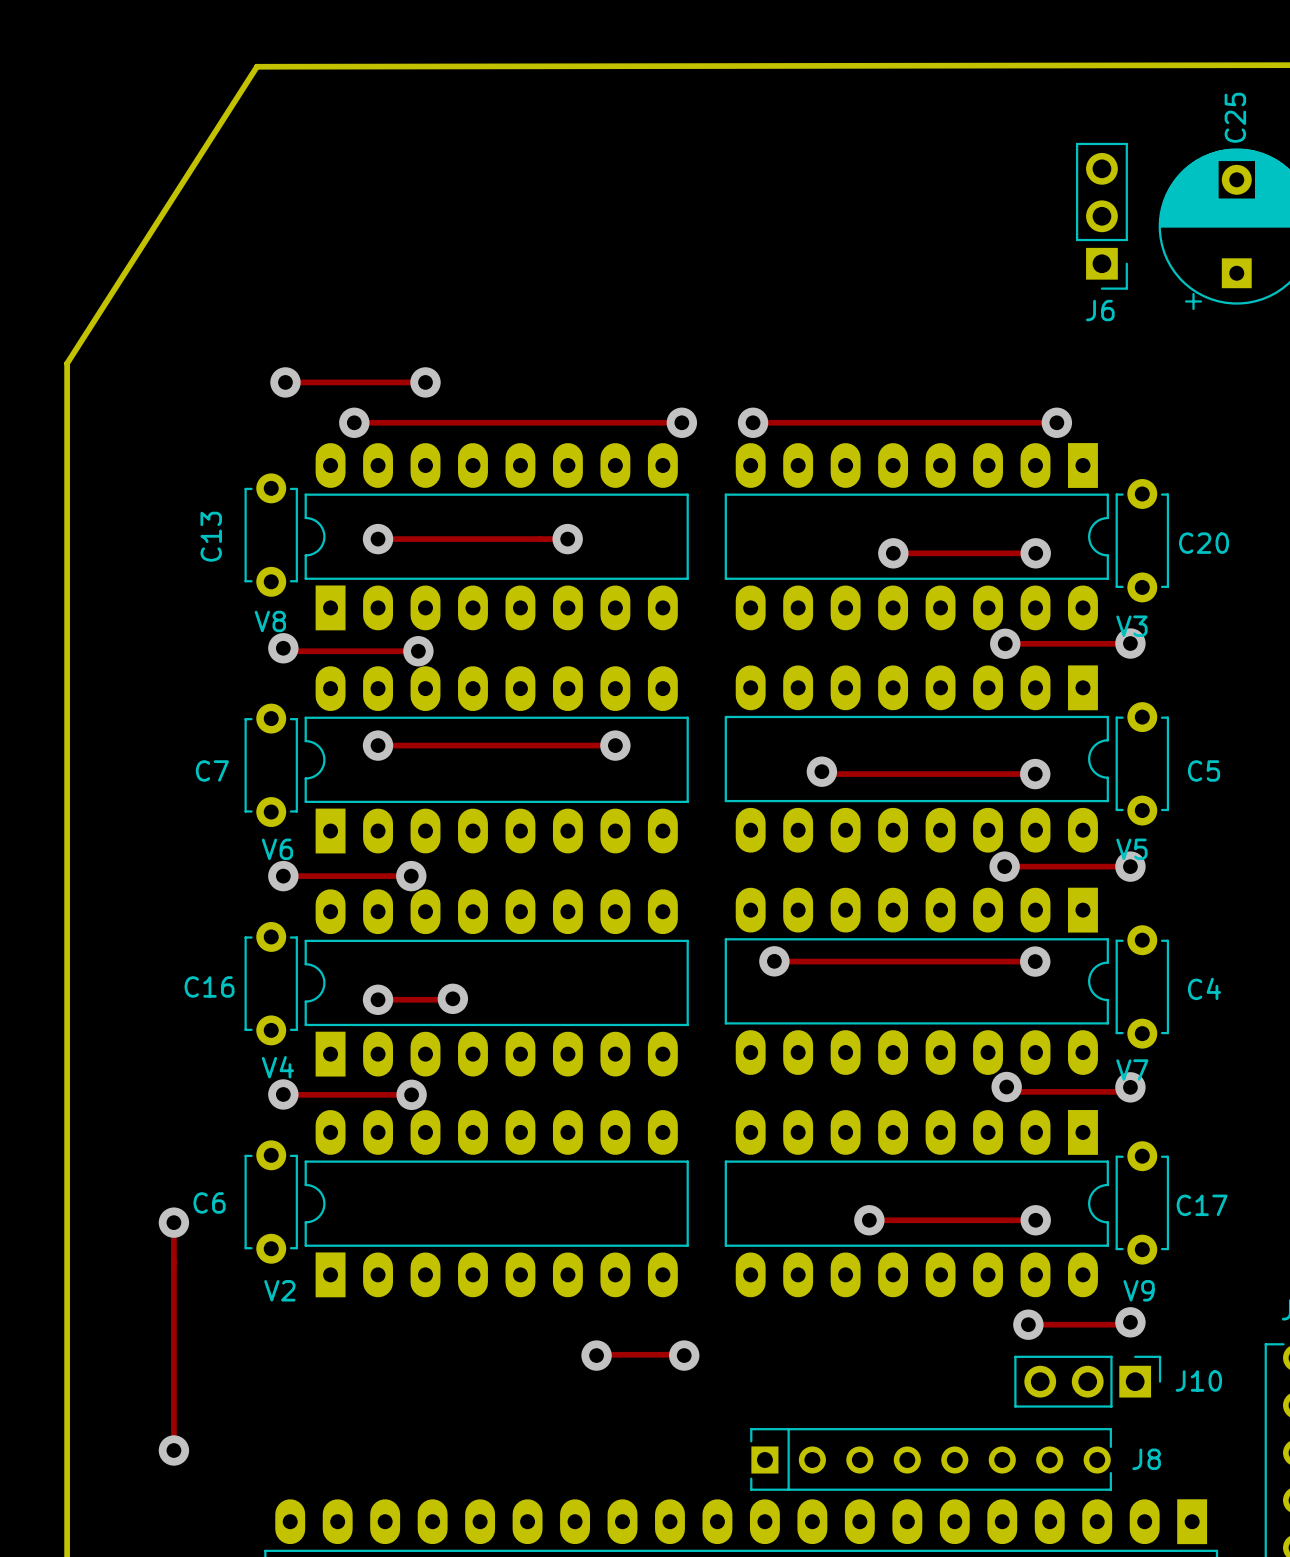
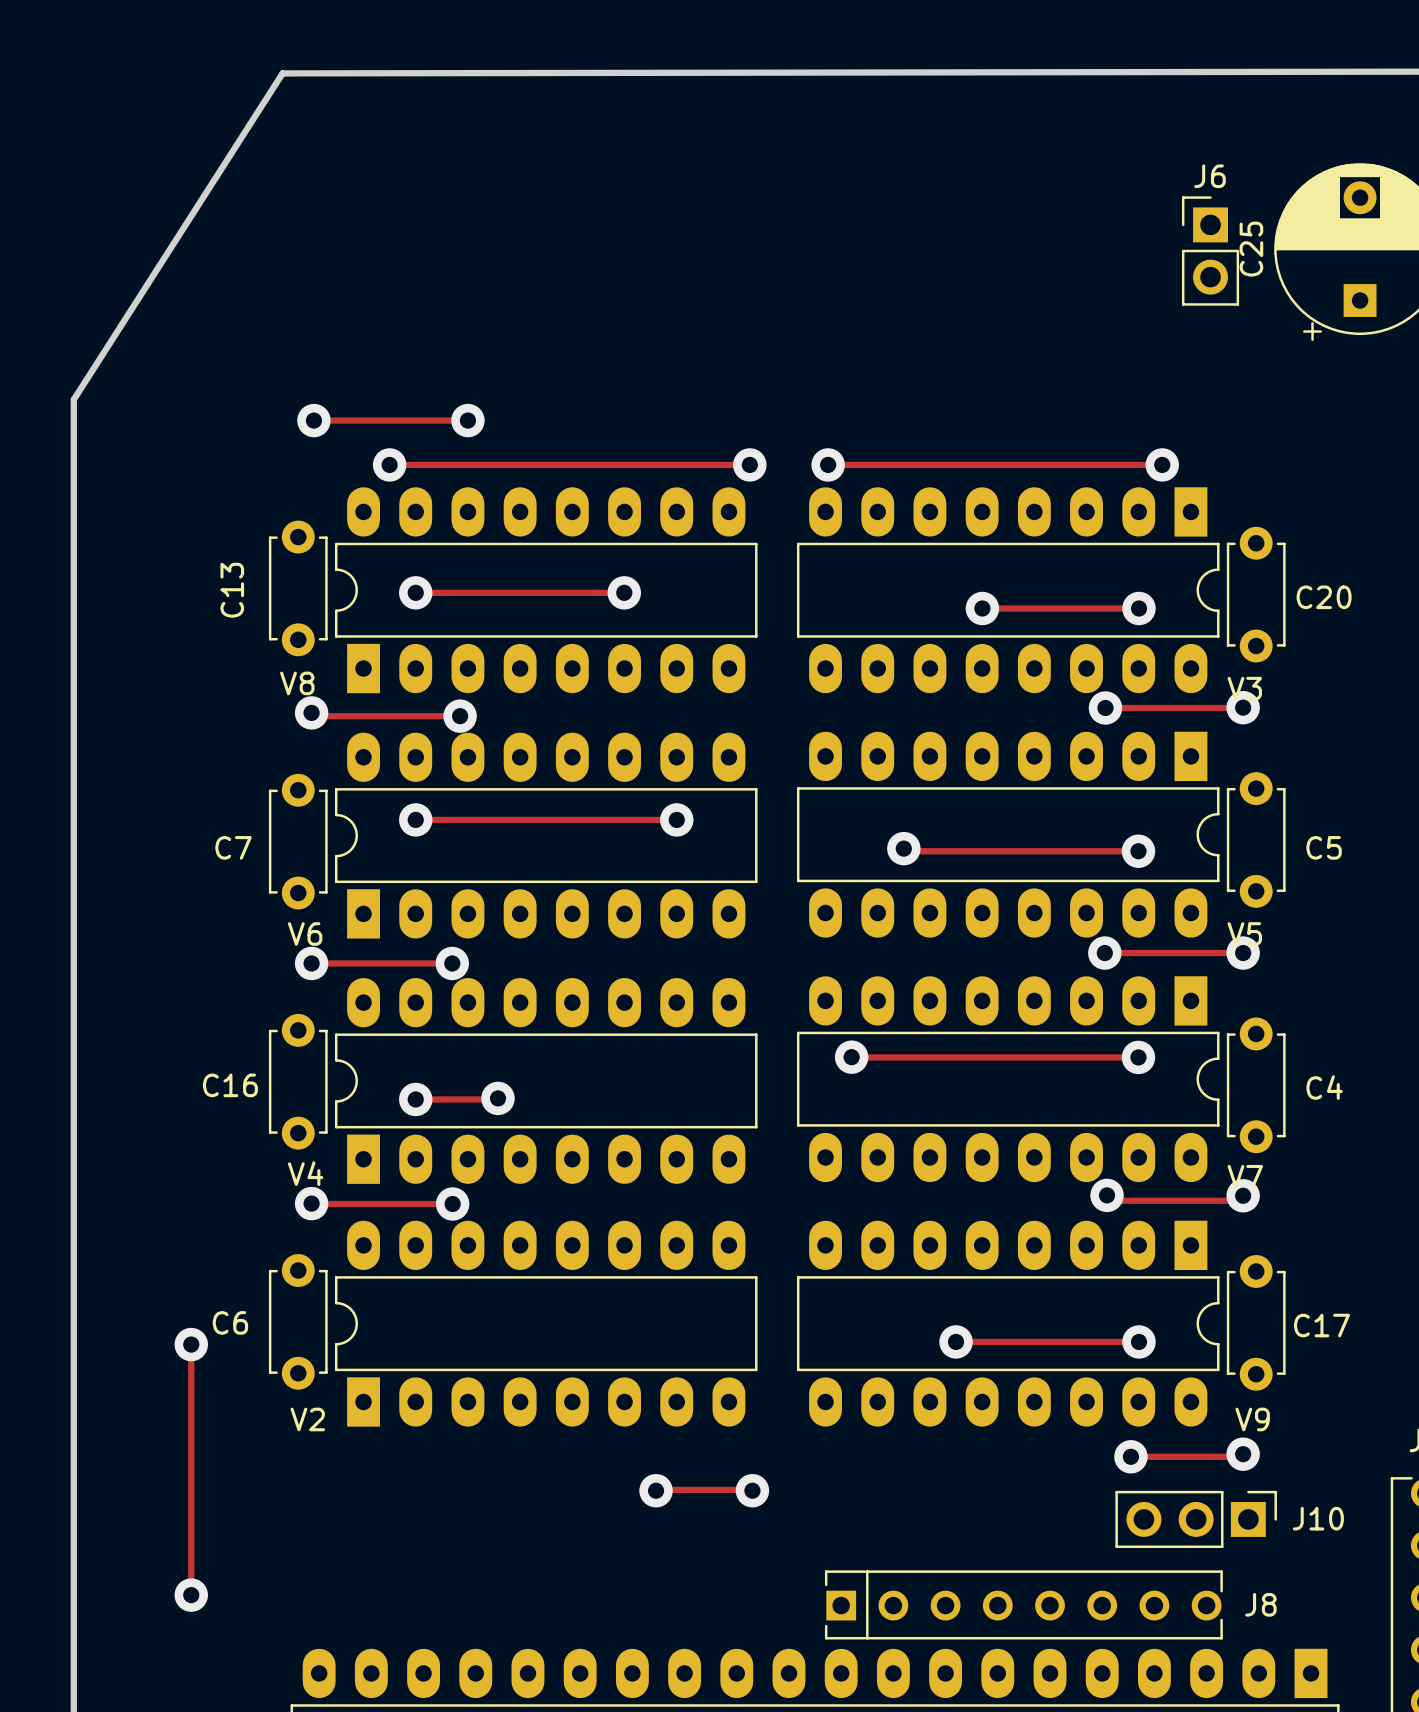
C25 name position: C25 (1235, 117) -> C25 (1251, 249)
J6 footprint: [1075, 142, 1128, 290] -> [1181, 196, 1240, 306]
J6 name position: J6 (1100, 310) -> J6 (1210, 176)

